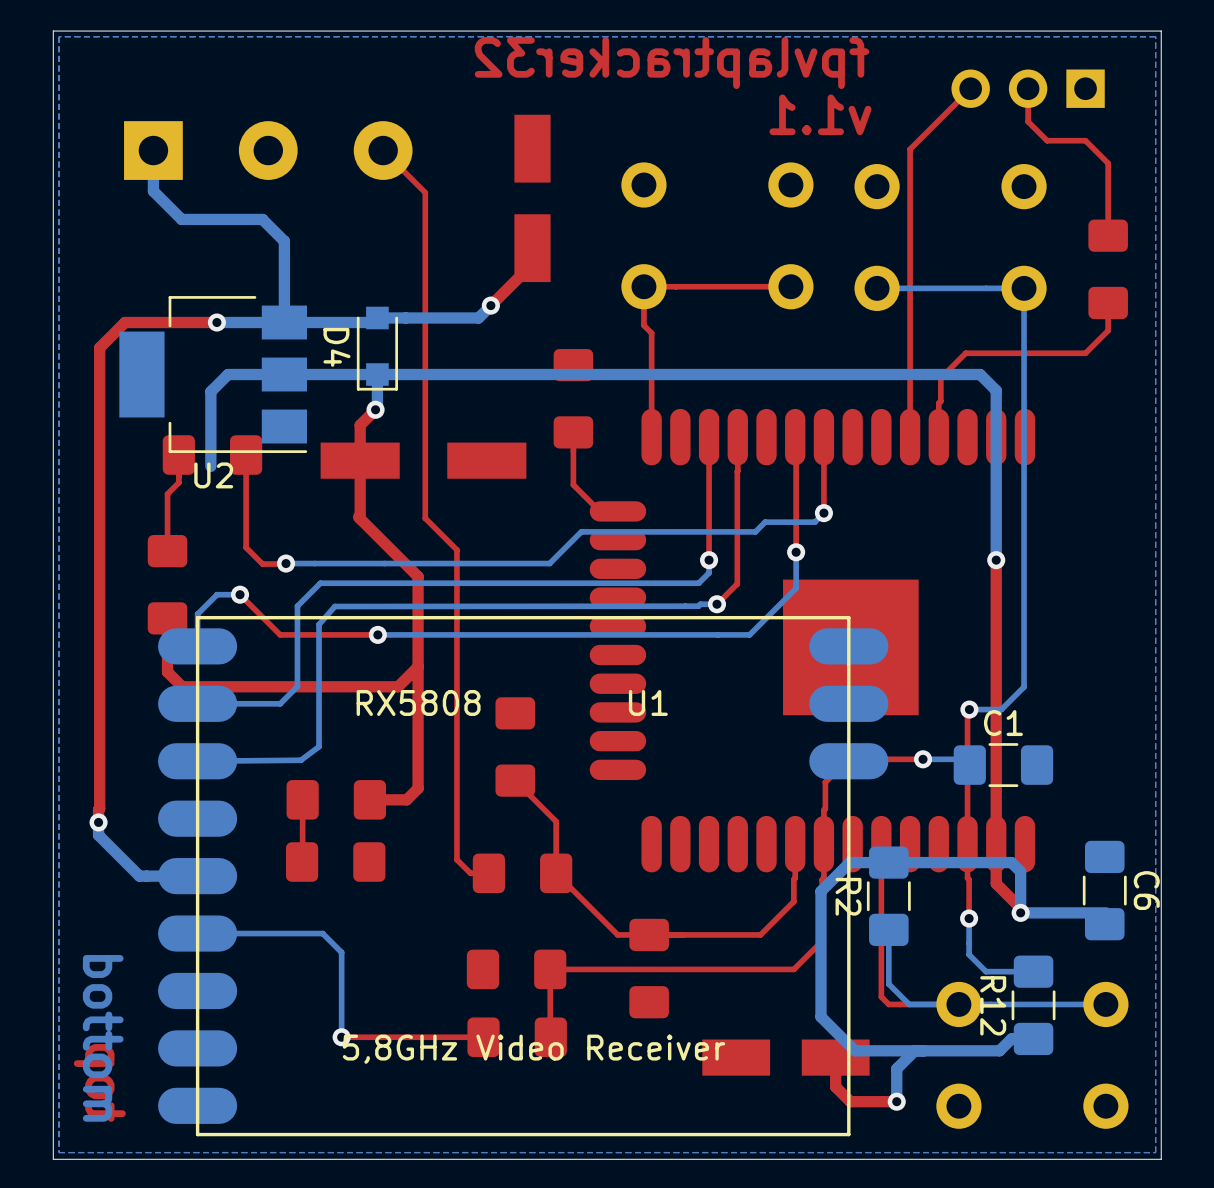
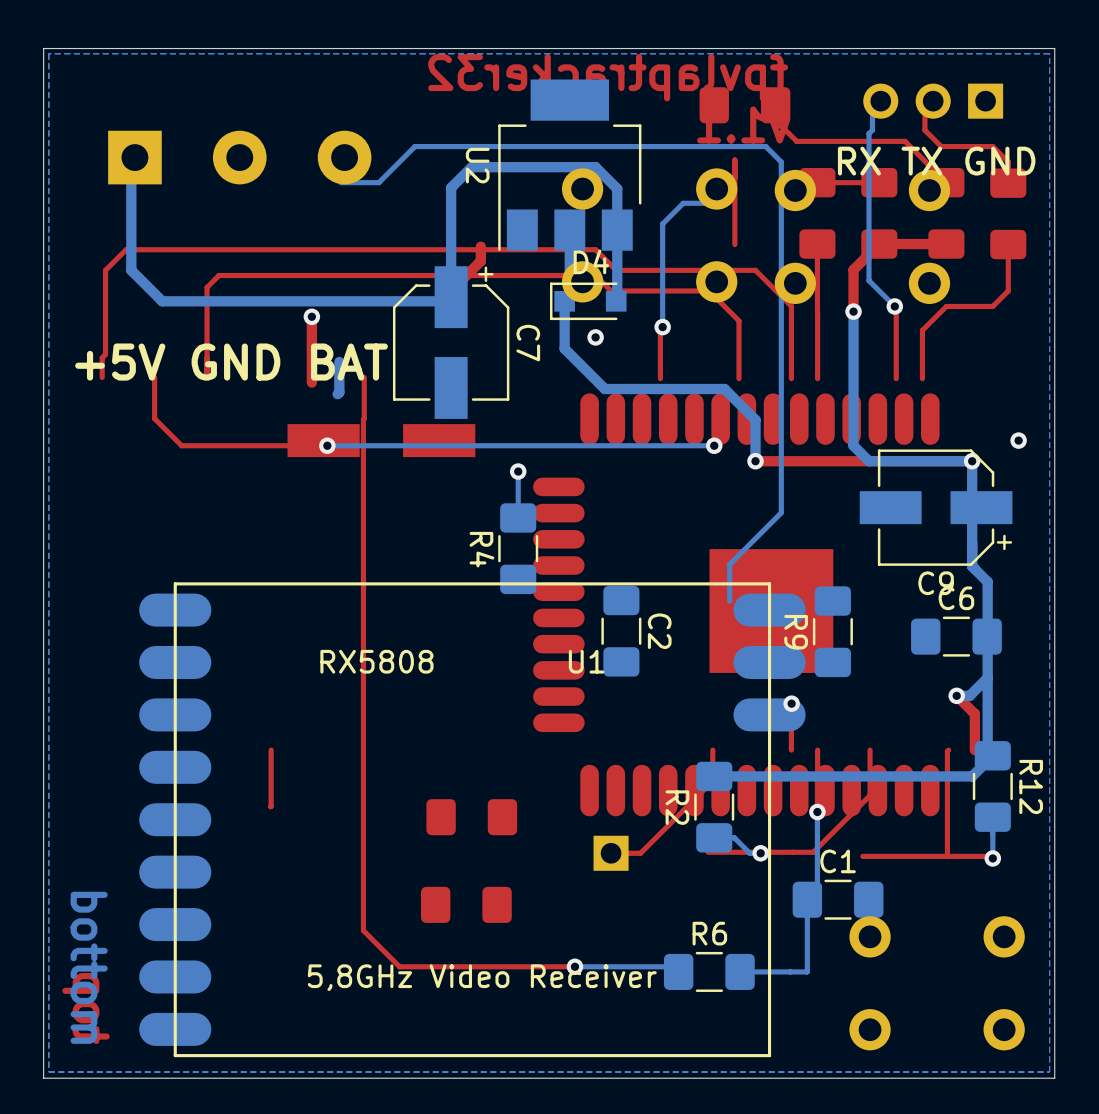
top track: (970, 88) (910, 149) (910, 437) -> none
top track: (1028, 88) (1028, 121) (1047, 140) (1085, 140) (1108, 163) (1108, 235) -> none
part: none -> (744, 105)
top track: none -> (775, 105) (775, 125) (781, 125) (796, 141) (905, 141) (946, 182)
bottom track: none -> (872, 105) (872, 130) (869, 133) (869, 280) (894, 306)
top track: none -> (924, 105) (924, 130) (941, 146) (992, 146) (1008, 162) (1008, 183)
bottom track: (153, 150) (153, 191) (181, 219) (262, 219) (284, 241) (284, 322) -> none
top track: (383, 150) (425, 192) (425, 518) (456, 549) (456, 859) (470, 873) (488, 873) -> none
top track: none -> (734, 159) (734, 244)
text: none -> RX TX GND (936, 161)
bottom track: none -> (131, 182) (131, 270) (162, 301) (447, 301) (451, 297) (451, 187) (471, 167) (595, 167) (617, 188) (616, 301)
bottom track: none -> (340, 182) (378, 182) (415, 146) (765, 146) (781, 162) (781, 512) (729, 564) (729, 601)
top track: none -> (879, 182) (817, 182)
C7 side: top (532, 198) -> bottom (451, 342)
bottom track: none -> (709, 203) (683, 203) (662, 223) (662, 327)
part: none -> (817, 213)
part: none -> (879, 213)
part: none -> (946, 213)
part: none -> (1008, 213)
bottom track: none -> (569, 230) (569, 296) (564, 301) (564, 348) (604, 389) (724, 389) (755, 419) (755, 461)
top track: none -> (817, 244) (817, 311)
top track: none -> (946, 244) (879, 244) (853, 269) (853, 311)
top track: none -> (1008, 244) (1008, 290) (992, 306) (946, 306) (922, 330) (922, 378)
part: (1108, 269) -> none
top track: (790, 286) (643, 286) (643, 325) (651, 333) (651, 437) -> none
bottom track: (877, 288) (1024, 288) (1024, 687) (1001, 709) (969, 709) -> none
top track: (1108, 302) (1108, 330) (1085, 353) (965, 353) (940, 378) (938, 437) -> none
via: (490, 305) -> none
bottom track: (488, 308) (478, 317) (383, 317) (378, 322) (216, 322) -> none
top track: none -> (894, 306) (896, 378)
via: none -> (894, 306)
top track: none -> (817, 311) (817, 378)
bottom track: none -> (853, 311) (853, 445) (869, 461) (972, 461) (972, 566) (987, 581) (987, 750) (992, 755) (972, 776) (714, 776)
via: none -> (853, 311)
top track: (216, 322) (125, 322) (99, 347) (98, 822) -> none
via: (216, 322) -> none
top track: none -> (311, 316) (311, 382)
via: none -> (311, 316)
top track: none -> (662, 327) (660, 329) (660, 378)
via: none -> (662, 327)
via: none -> (595, 337)
D4 rotation: 0° (377, 348) -> 90° clockwise (588, 301)
D4 position: (377, 348) -> (588, 301)
U2 rotation: 0° (213, 374) -> 90° clockwise (569, 165)
U2 position: (213, 374) -> (569, 165)
text: none -> +5V GND BAT (231, 362)
top track: none -> (102, 377) (102, 357) (105, 354) (105, 270) (126, 249) (595, 249) (616, 270) (755, 270) (791, 306) (791, 378)
top track: none -> (154, 377) (154, 418) (181, 445) (327, 445)
top track: none -> (207, 377) (207, 287) (219, 275) (595, 275) (611, 290) (709, 290) (739, 320) (739, 378)
R4 side: top (573, 398) -> bottom (518, 548)
top track: (375, 409) (360, 425) (360, 518) -> none
via: (375, 409) -> none
top track: (573, 432) (573, 484) (599, 511) (617, 511) -> none
top track: (709, 437) (709, 560) -> none
top track: (737, 437) (737, 583) (716, 604) -> none
top track: (795, 437) (796, 552) -> none
top track: (823, 437) (823, 513) -> none
top track: (178, 455) (178, 482) (167, 494) (167, 551) -> none
part: (212, 455) -> none
top track: (246, 455) (246, 547) (262, 564) (286, 563) -> none
via: none -> (1018, 440)
bottom track: (210, 466) (210, 391) (228, 374) (980, 374) (996, 390) (996, 560) -> none
via: none -> (327, 445)
bottom track: none -> (714, 445) (327, 445)
via: none -> (714, 445)
via: none -> (755, 461)
top track: none -> (972, 461) (755, 461)
via: none -> (972, 461)
bottom track: none -> (518, 471) (518, 517)
via: none -> (518, 471)
bottom track: (823, 513) (814, 522) (765, 522) (755, 531) (581, 531) (549, 563) (286, 563) -> none
via: (823, 513) -> none
top track: (358, 517) (418, 576) (418, 788) (406, 799) (369, 799) -> none
C9: none -> (936, 507)
bottom track: (796, 552) (796, 588) (749, 634) (377, 634) -> none
via: (796, 552) -> none
bottom track: (709, 560) (709, 572) (698, 583) (320, 583) (297, 606) (297, 686) (280, 703) (197, 703) -> none
via: (709, 560) -> none
top track: (996, 560) (996, 883) (1020, 908) -> none
via: (996, 560) -> none
via: (286, 563) -> none
part: (167, 584) -> none
bottom track: (240, 594) (217, 594) (197, 614) (197, 646) -> none
top track: (240, 594) (280, 634) (377, 634) -> none
via: (240, 594) -> none
bottom track: (716, 604) (700, 604) (698, 606) (334, 606) (319, 624) (319, 746) (300, 760) (197, 761) -> none
via: (716, 604) -> none
top track: (167, 618) (167, 672) (182, 686) (398, 686) (418, 666) -> none
via: (377, 634) -> none
top track: (969, 709) (967, 711) (969, 918) -> none
via: (969, 709) -> none
bottom track: none -> (987, 677) (969, 695) (956, 695)
top track: none -> (956, 695) (974, 714) (974, 750)
via: none -> (956, 695)
C2 side: top (515, 747) -> bottom (621, 631)
bottom track: (923, 759) (964, 759) (969, 765) -> none
top track: (923, 759) (848, 759) (825, 782) (822, 941) (793, 969) (550, 969) (550, 1037) -> none
via position: (923, 759) -> (791, 703)
top track: none -> (791, 719) (791, 750)
C1 position: (1003, 765) -> (838, 899)
top track: (515, 780) (556, 821) (556, 873) (617, 934) (760, 934) (793, 901) (795, 844) -> none
part: (336, 799) -> none
top track: none -> (712, 750) (712, 781) (640, 853) (605, 853)
top track: none -> (817, 750) (817, 781)
top track: none -> (870, 750) (870, 795) (813, 852) (708, 852)
top track: none -> (948, 750) (947, 856)
bottom track: (98, 822) (98, 835) (139, 876) (197, 876) -> none
via: (98, 822) -> none
top track: none -> (817, 781) (817, 812)
top track: (881, 844) (881, 997) (888, 1004) (958, 1004) -> none
part: (335, 862) -> none
bottom track: none -> (817, 812) (817, 889) (807, 899) (807, 971)
via: none -> (817, 812)
bottom track: none -> (992, 817) (992, 858)
C6 rotation: 0° (1104, 890) -> 90° clockwise (956, 636)
C6 position: (1104, 890) -> (956, 636)
C6 name position: C6 (1146, 890) -> C6 (956, 598)
bottom track: none -> (714, 837) (734, 837) (749, 853) (760, 853)
R2 position: (888, 896) -> (714, 807)
part: none -> (611, 853)
via: none -> (760, 853)
bottom track: (1020, 912) (1020, 871) (1011, 862) (849, 862) (821, 891) (821, 1016) (854, 1050) (999, 1050) (1011, 1038) (1033, 1038) -> none
via: (1020, 912) -> none
bottom track: (1106, 912) (1025, 912) -> none
top track: none -> (862, 856) (990, 856) (992, 858)
bottom track: (969, 918) (969, 954) (986, 971) (1033, 971) -> none
via: (969, 918) -> none
via: none -> (992, 858)
bottom track: (888, 929) (888, 984) (909, 1004) (1105, 1004) -> none
bottom track: (197, 933) (322, 933) (341, 952) (341, 1037) -> none
R9 side: top (649, 968) -> bottom (832, 631)
R12 name position: R12 (993, 1005) -> R12 (1031, 786)
R12 position: (1033, 1005) -> (992, 786)
via: (341, 1037) -> none
top track: (443, 1037) (341, 1037) -> (399, 966) (363, 930) (364, 377)
R6 side: top (517, 1037) -> bottom (709, 971)
bottom track: none -> (574, 966) (673, 966) (678, 971)
top track: none -> (574, 966) (436, 966)
via: none -> (574, 966)
bottom track: none -> (807, 971) (740, 971)
bottom track: (914, 1050) (896, 1068) (896, 1101) -> none
part: (785, 1057) -> none
top track: (835, 1057) (835, 1086) (850, 1101) (896, 1101) -> none
via: (896, 1101) -> none

